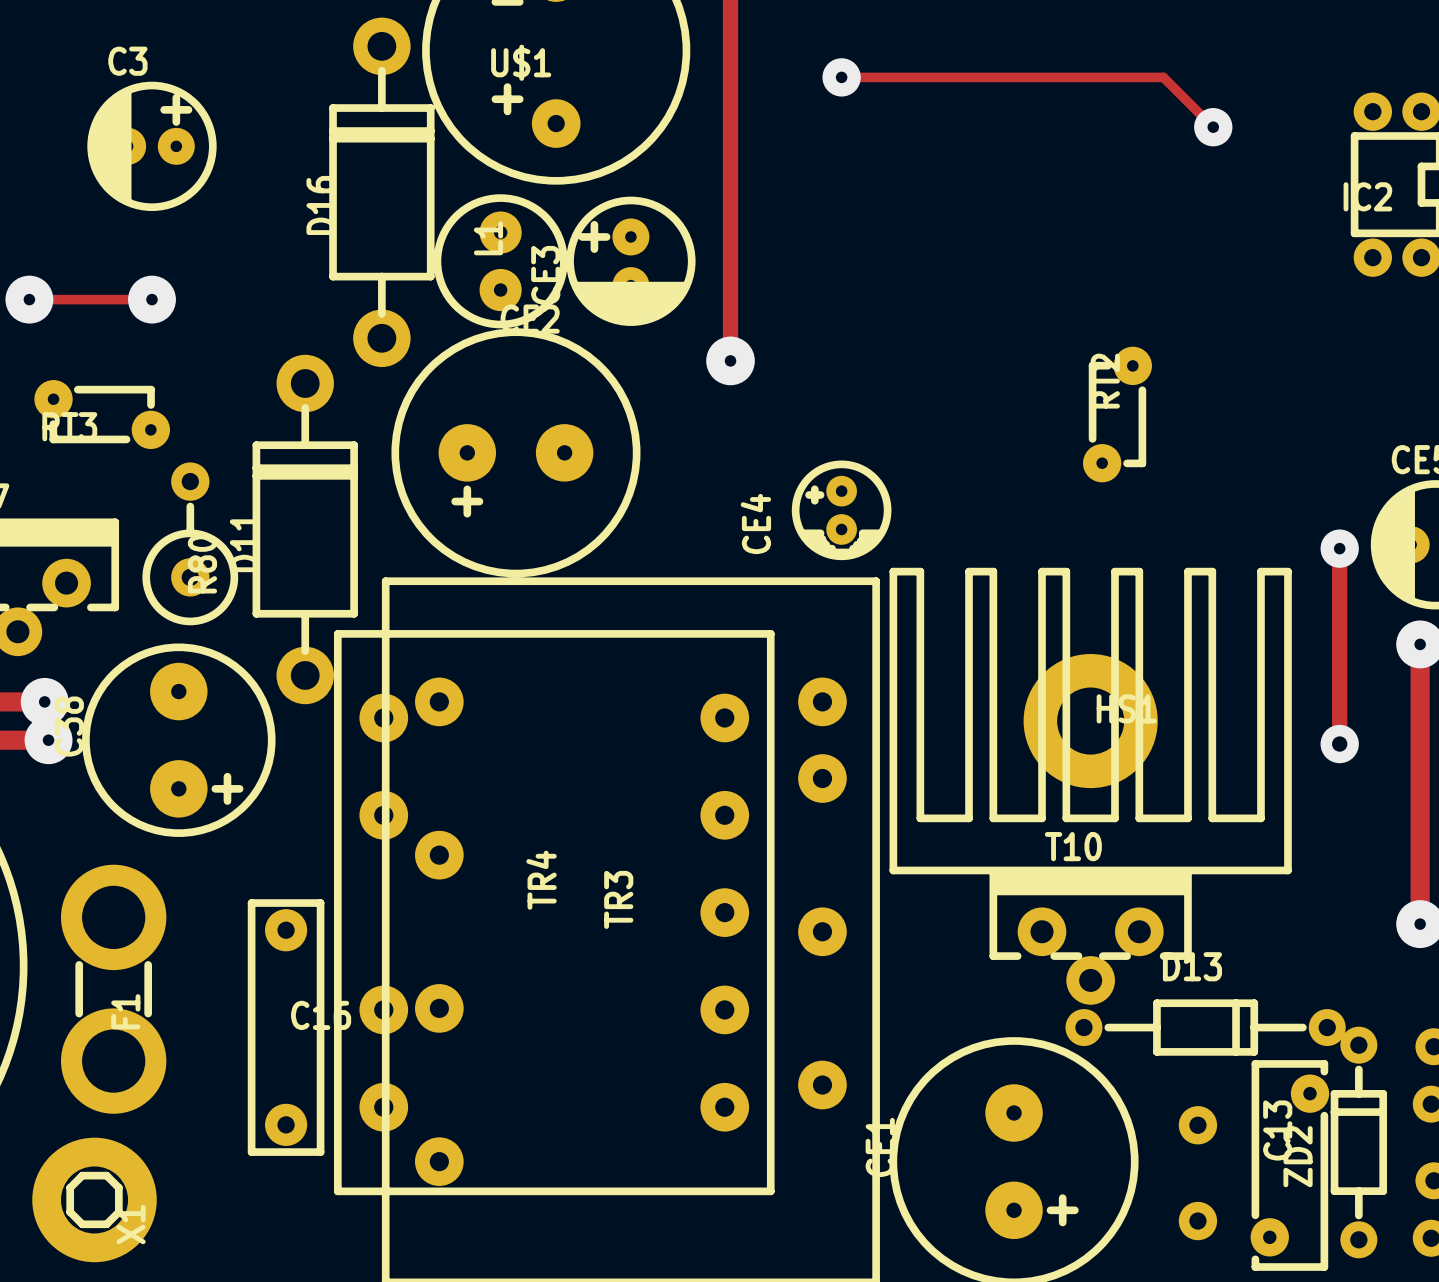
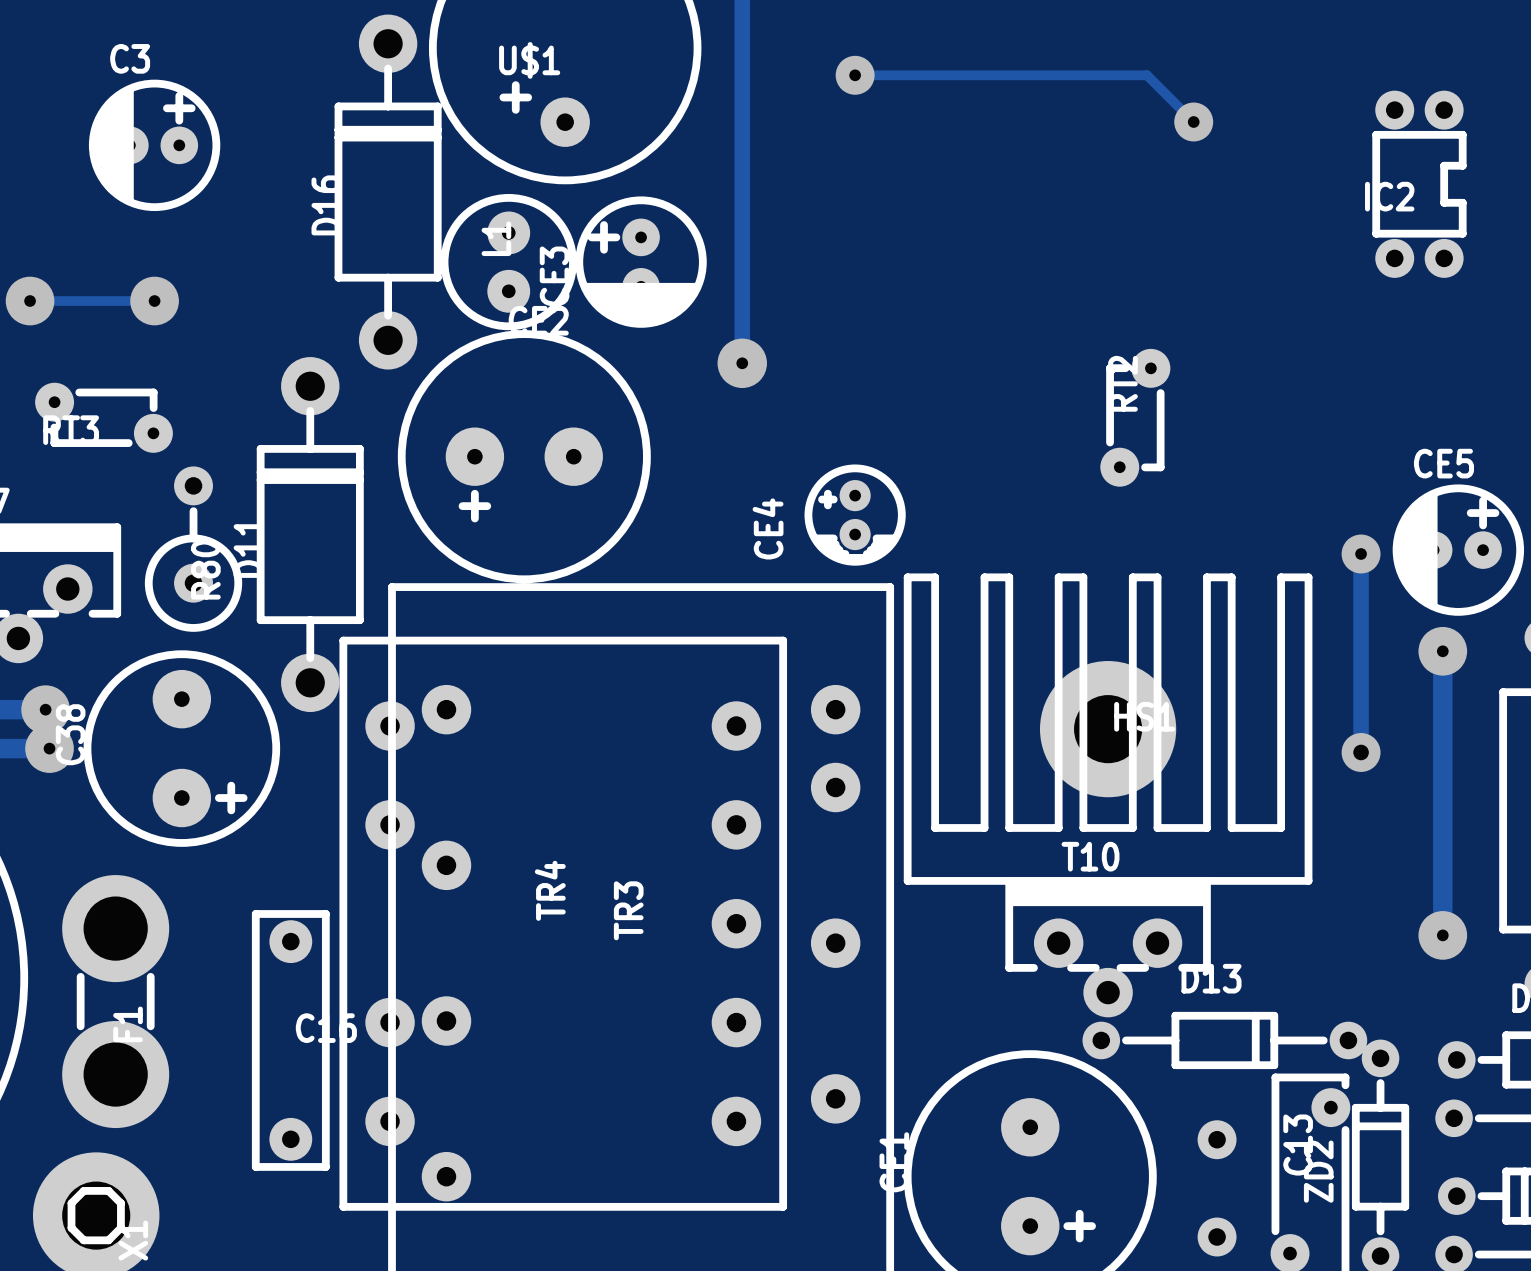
track: (1128, 77) (1163, 77) (1213, 127) -> (1147, 75) (1193, 122)
via position: (1213, 127) -> (1193, 122)

